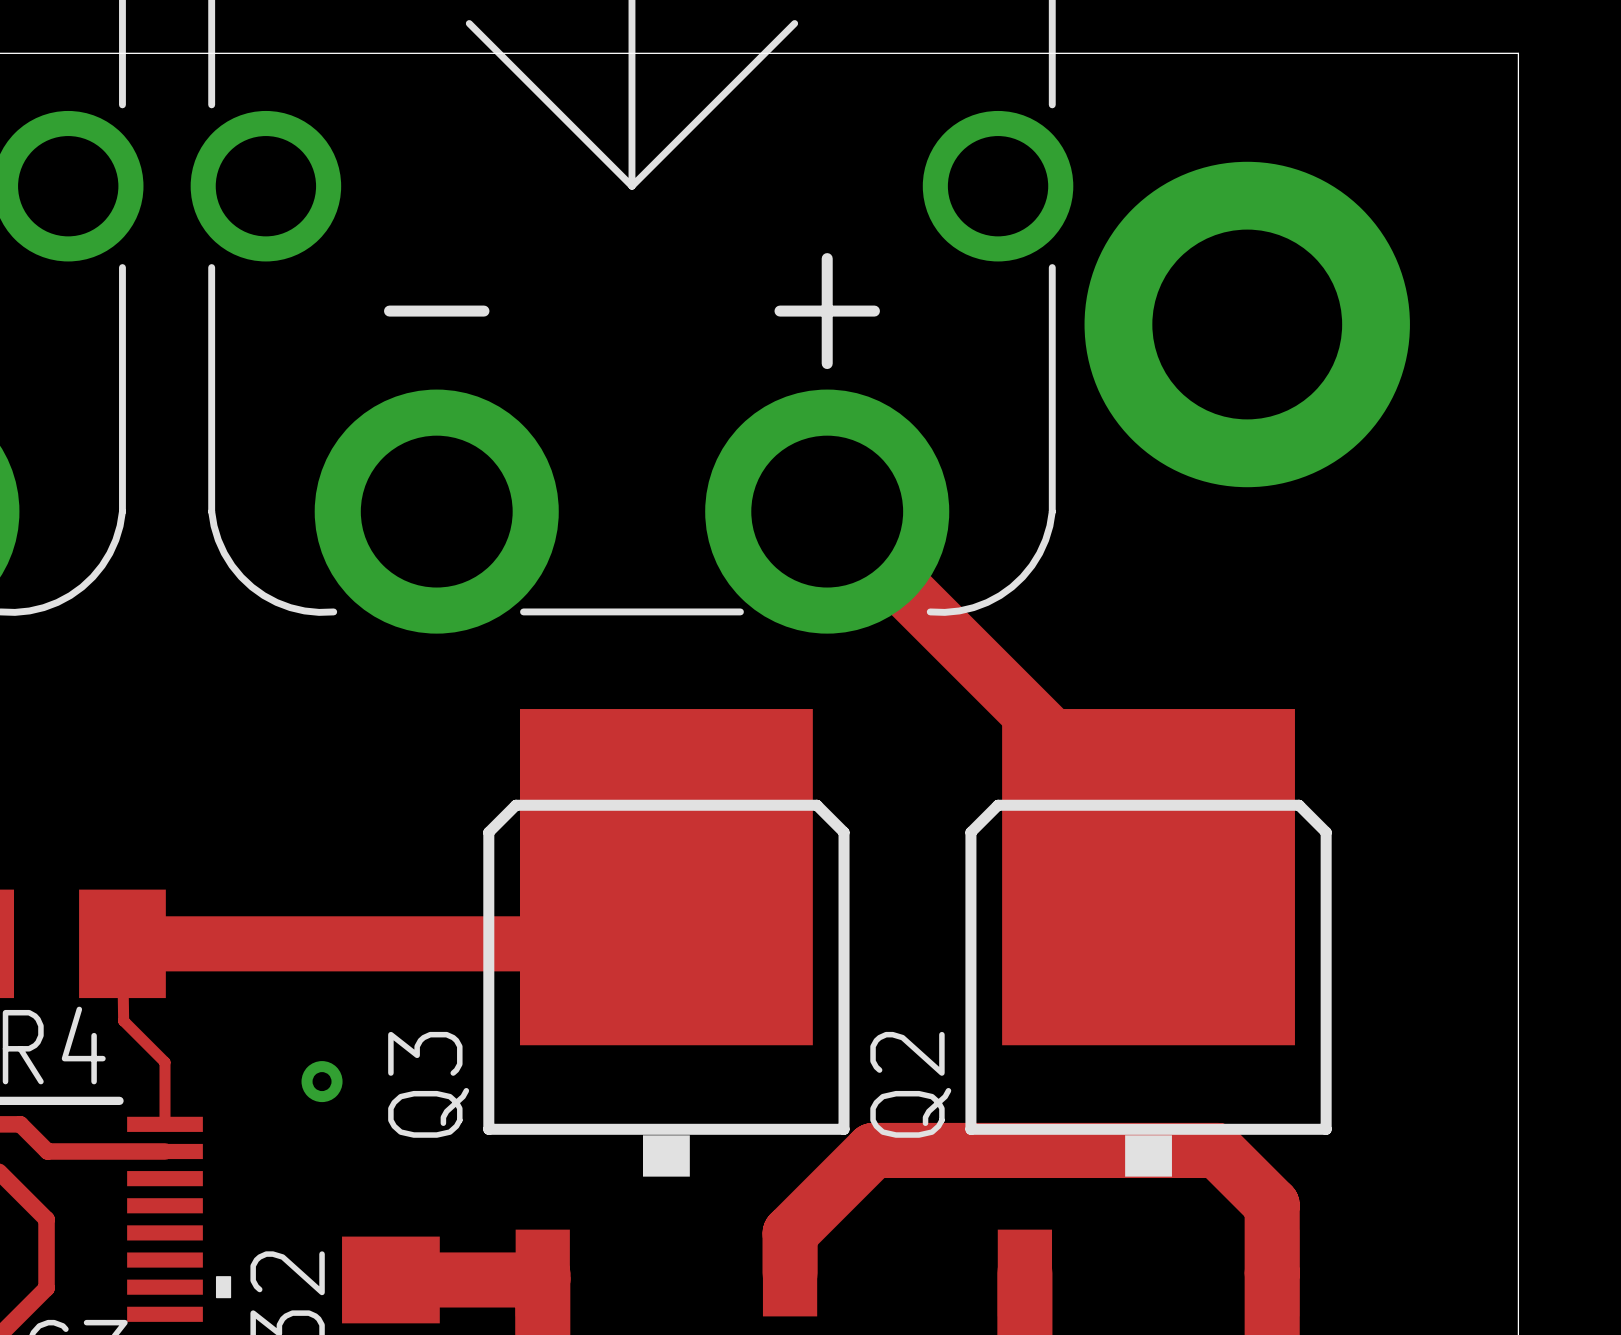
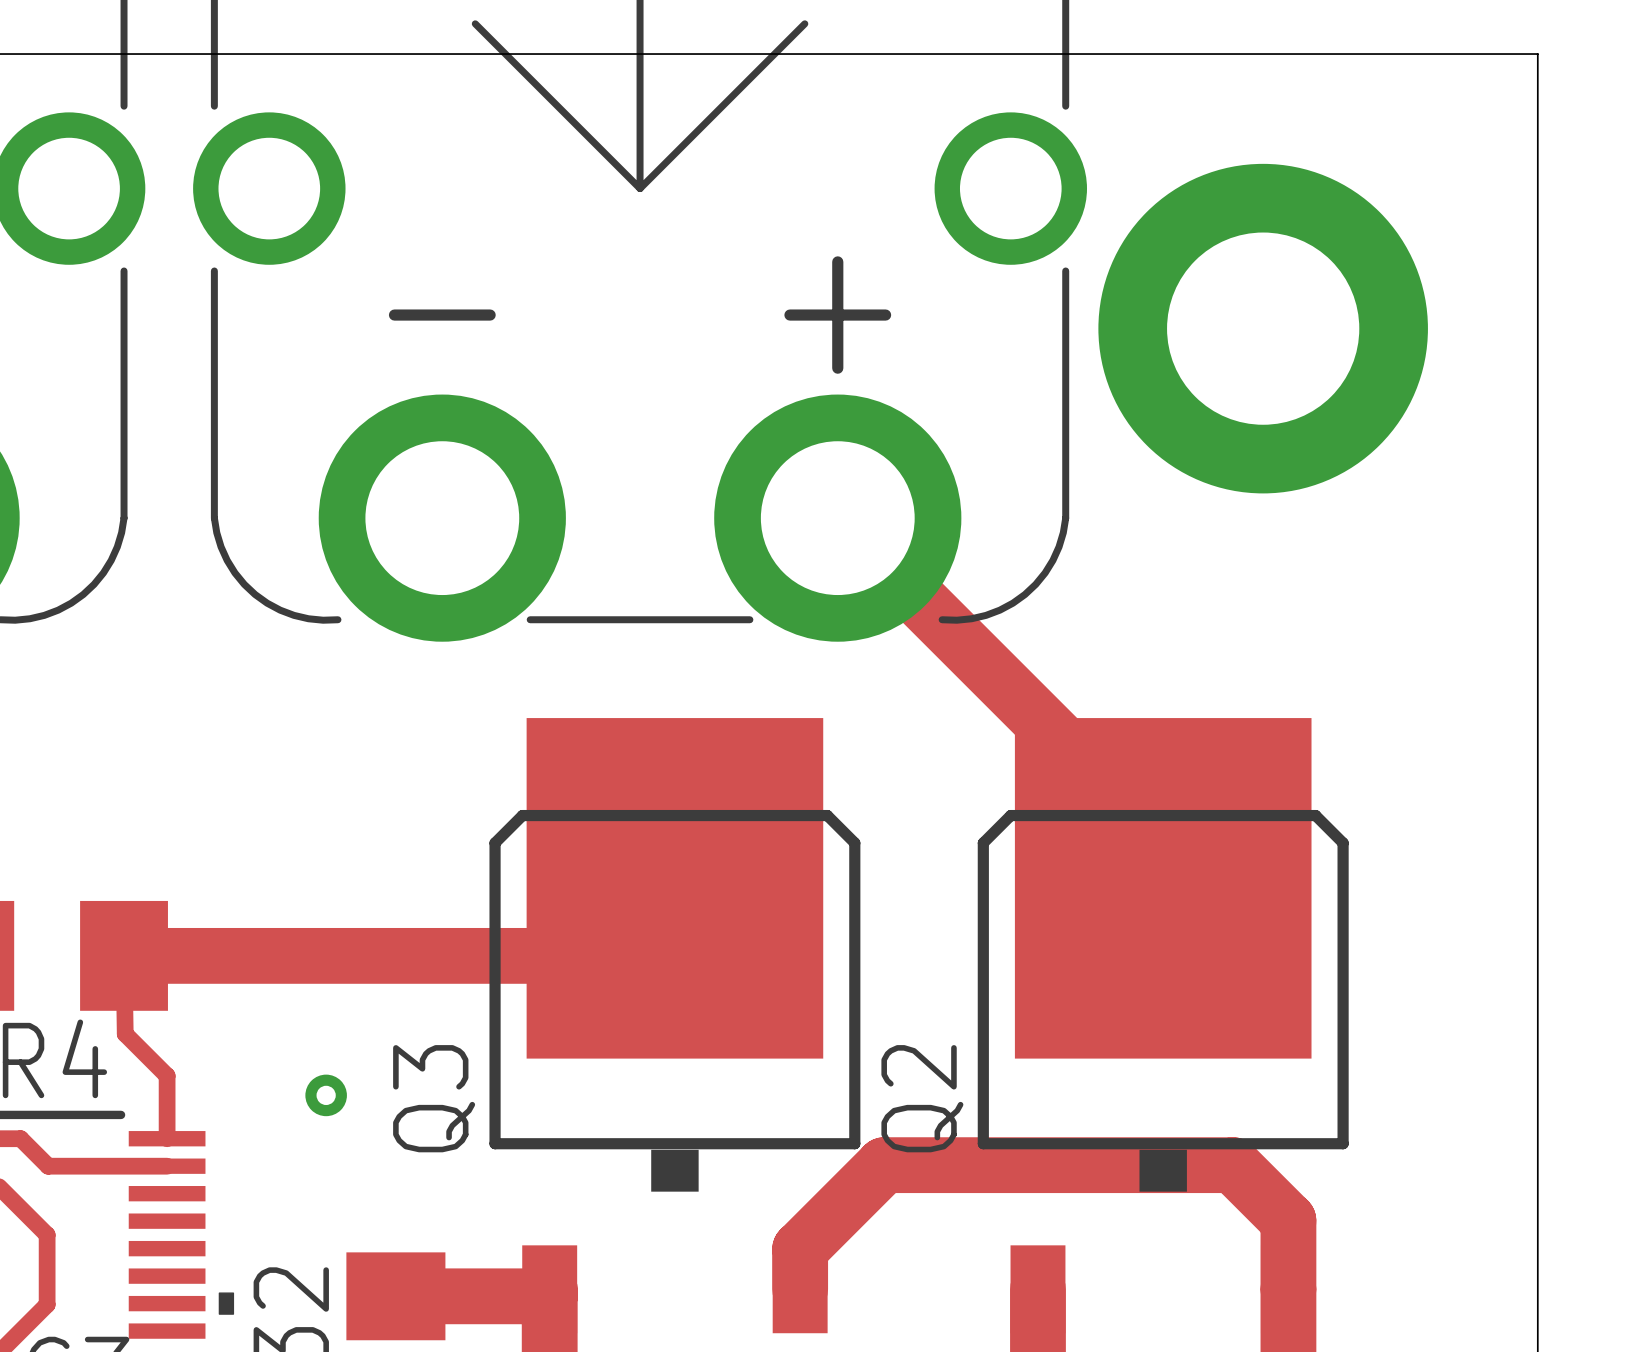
top track width: thin (122, 943) (123, 1020) (165, 1062) (165, 1124) -> thick (124, 955) (125, 1033) (167, 1075) (167, 1138)

